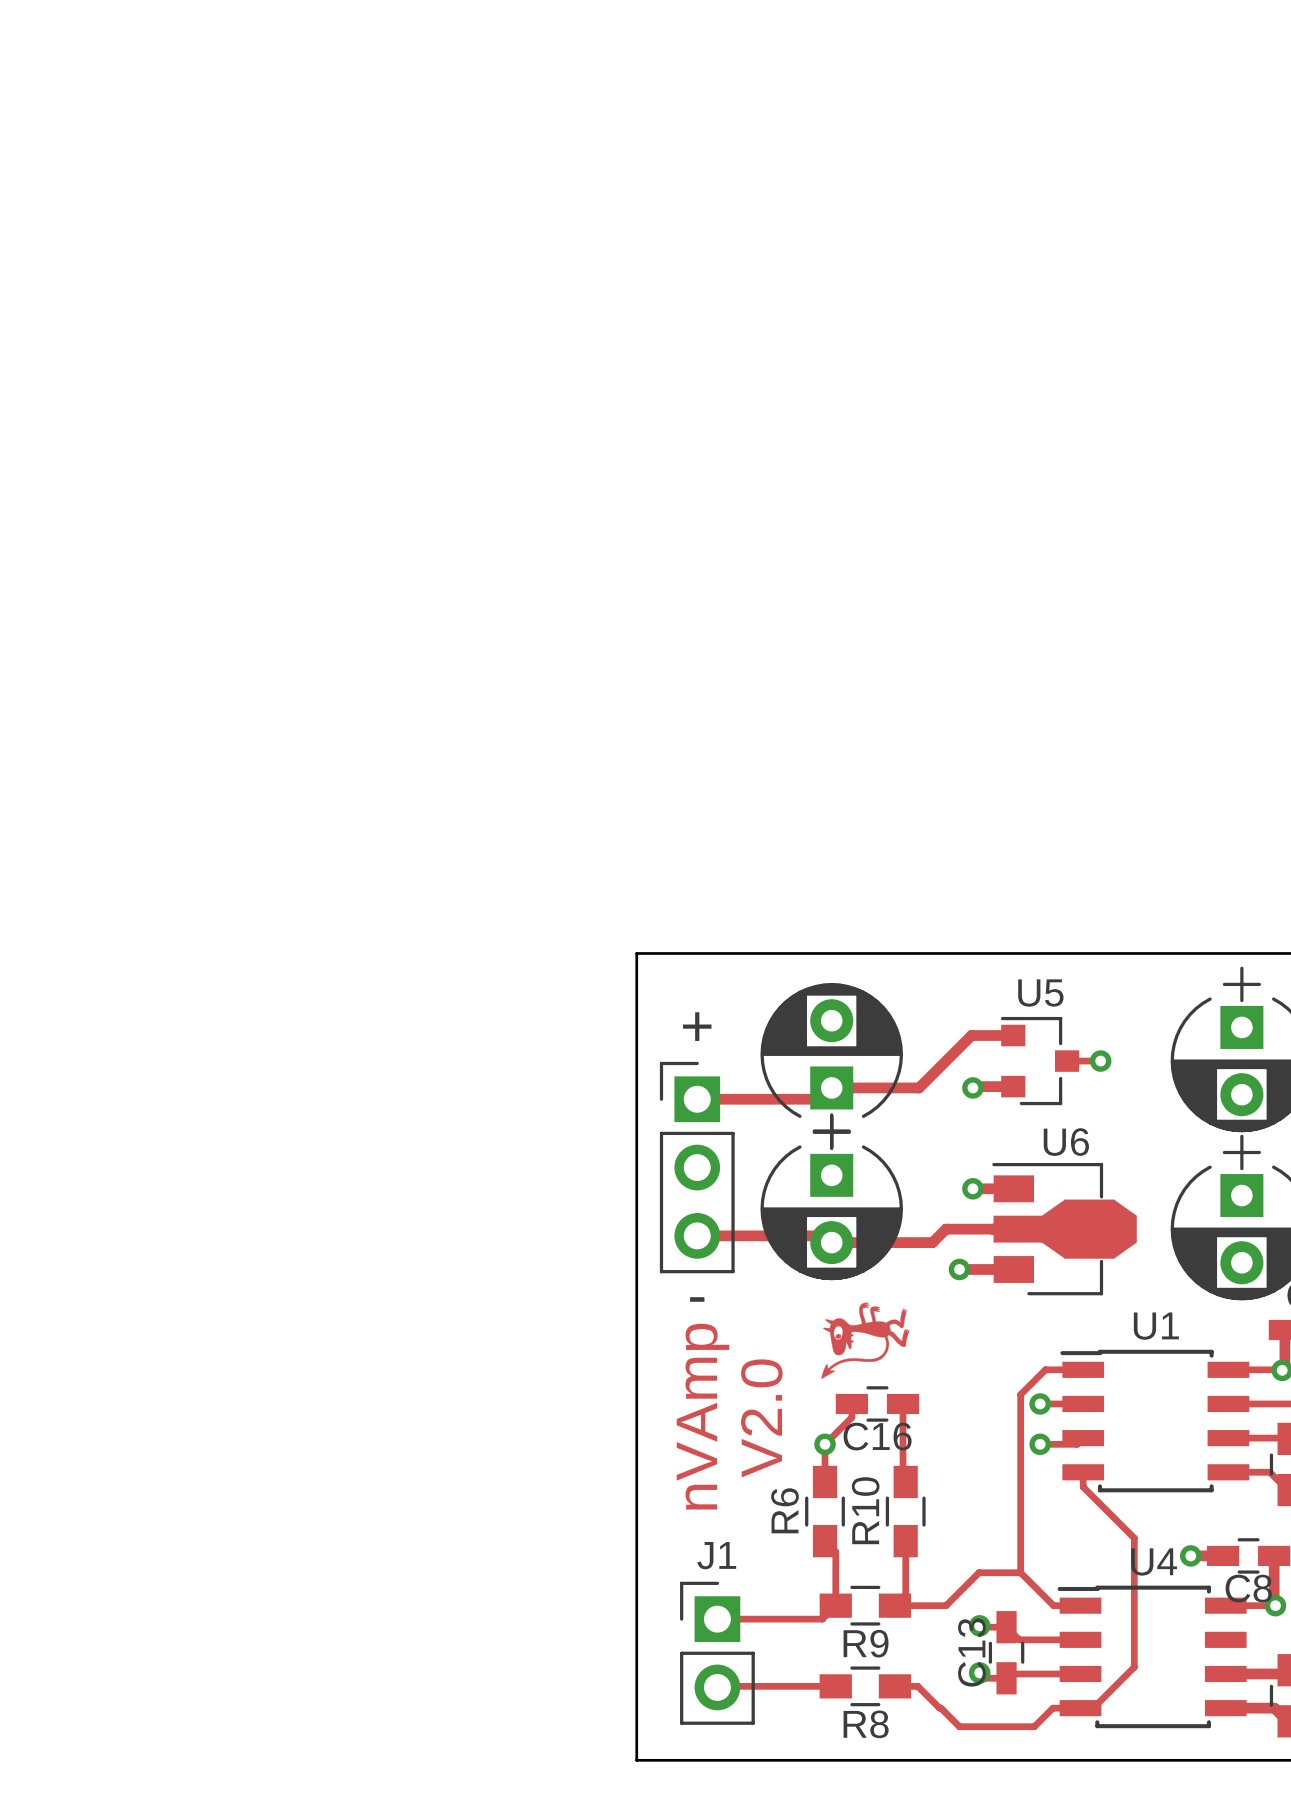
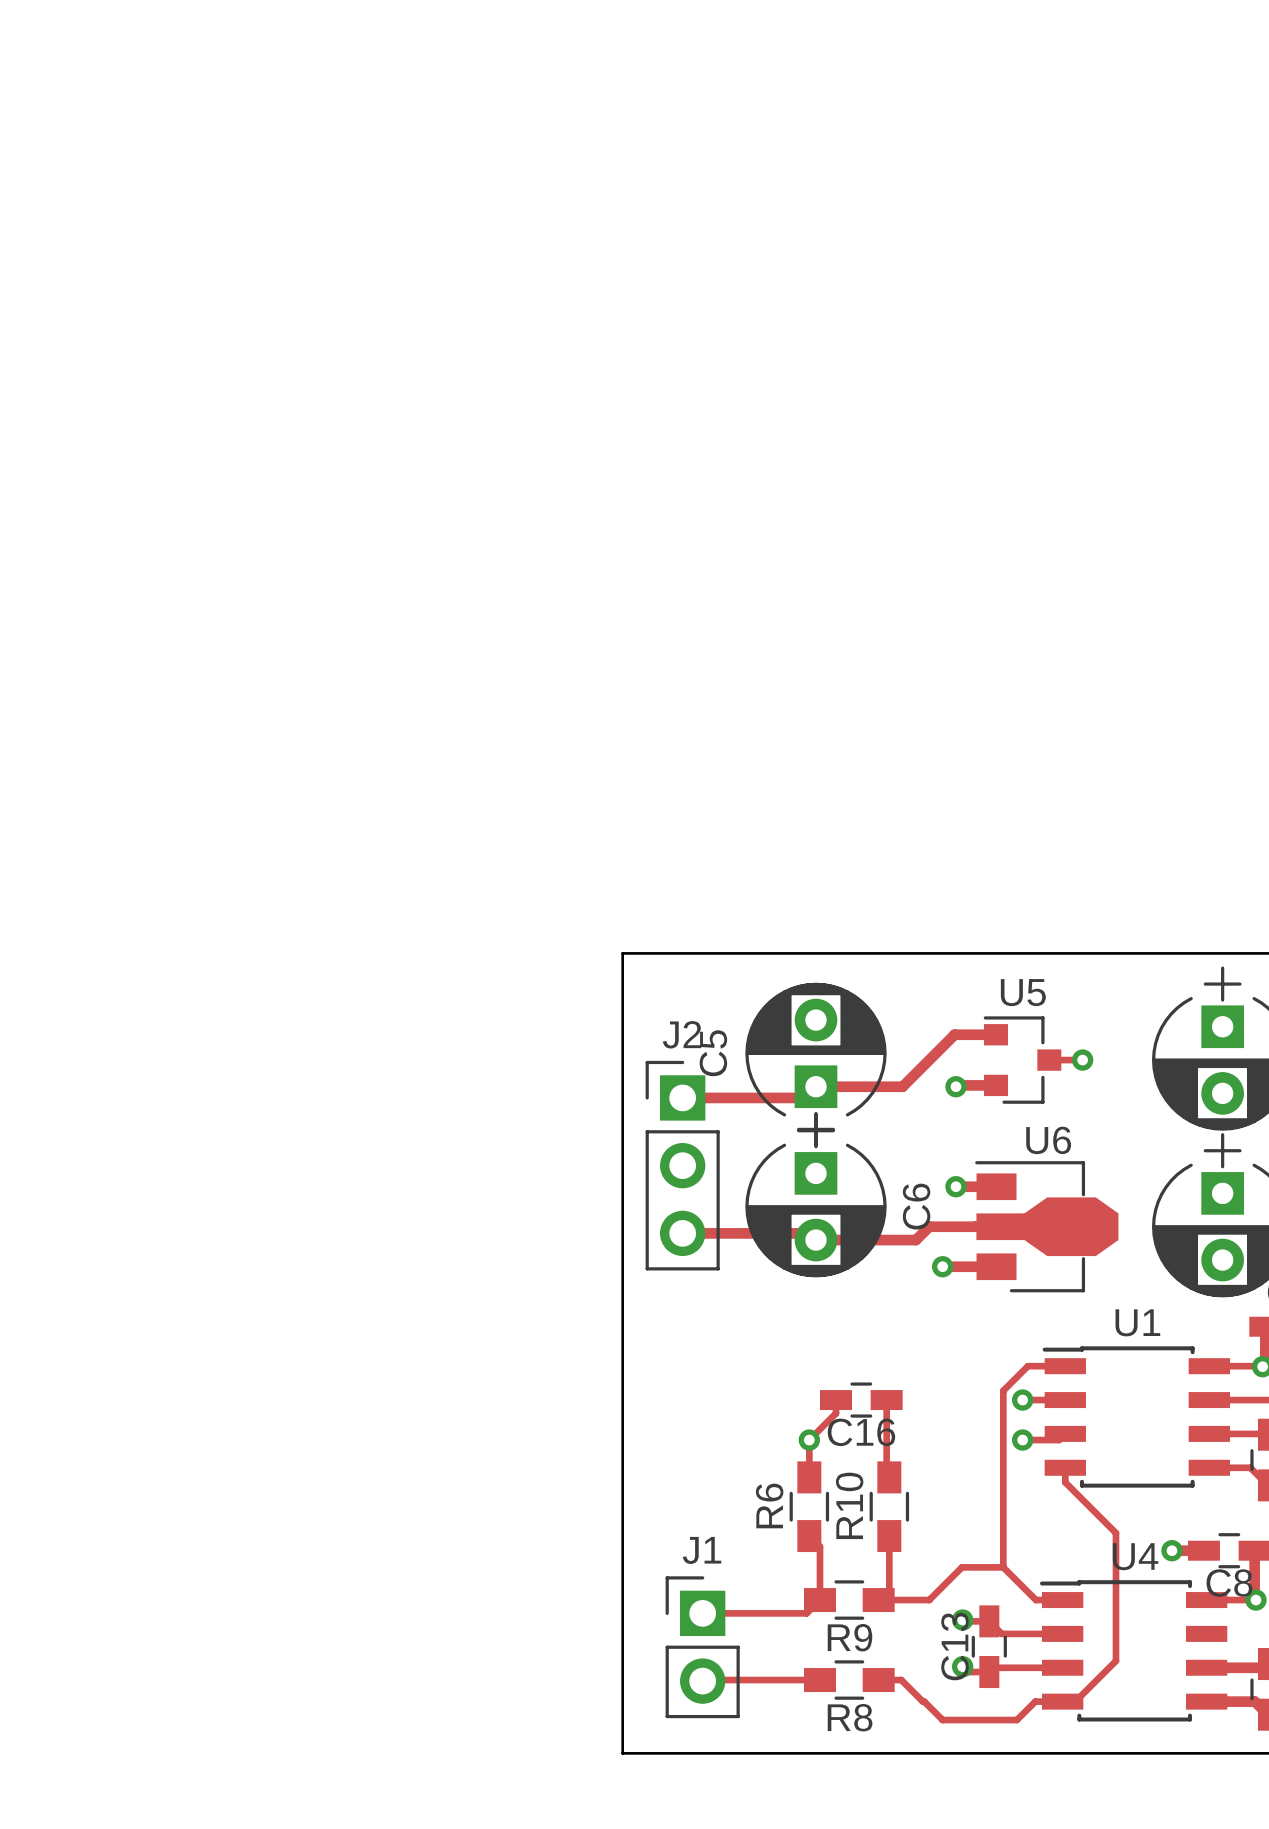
text: + (697, 1026) -> none
J2 name: none -> J2 (682, 1034)
C5 name: none -> C5 (713, 1053)
C6 name: none -> C6 (916, 1206)
text: - (697, 1299) -> none
drawing: [821, 1302, 910, 1379] -> none
text: nVAmp (702, 1416) -> none
text: V2.0 (761, 1418) -> none

